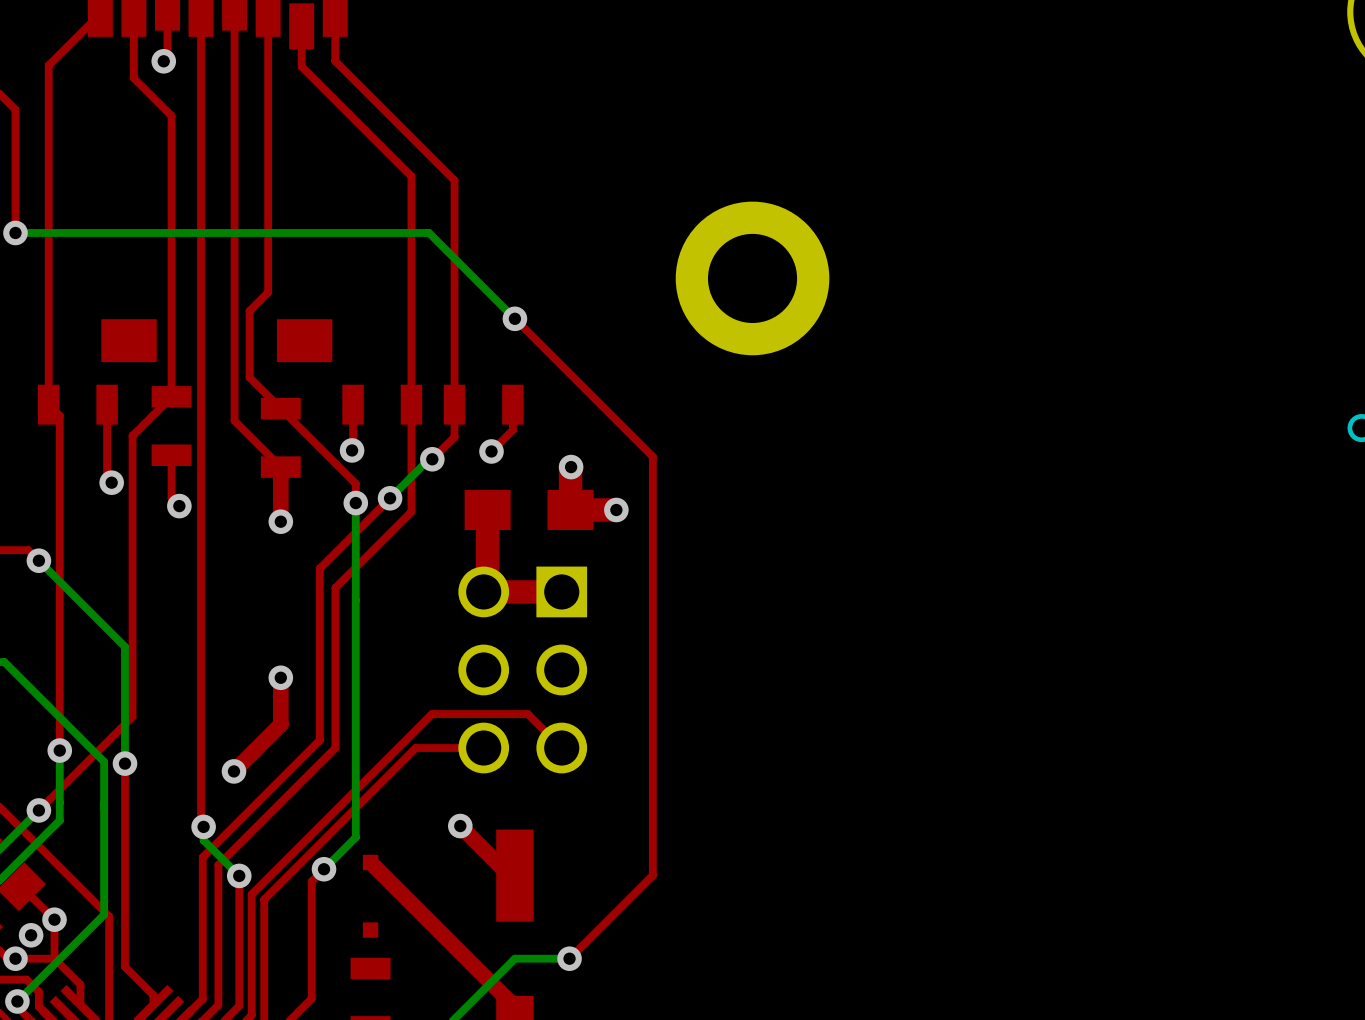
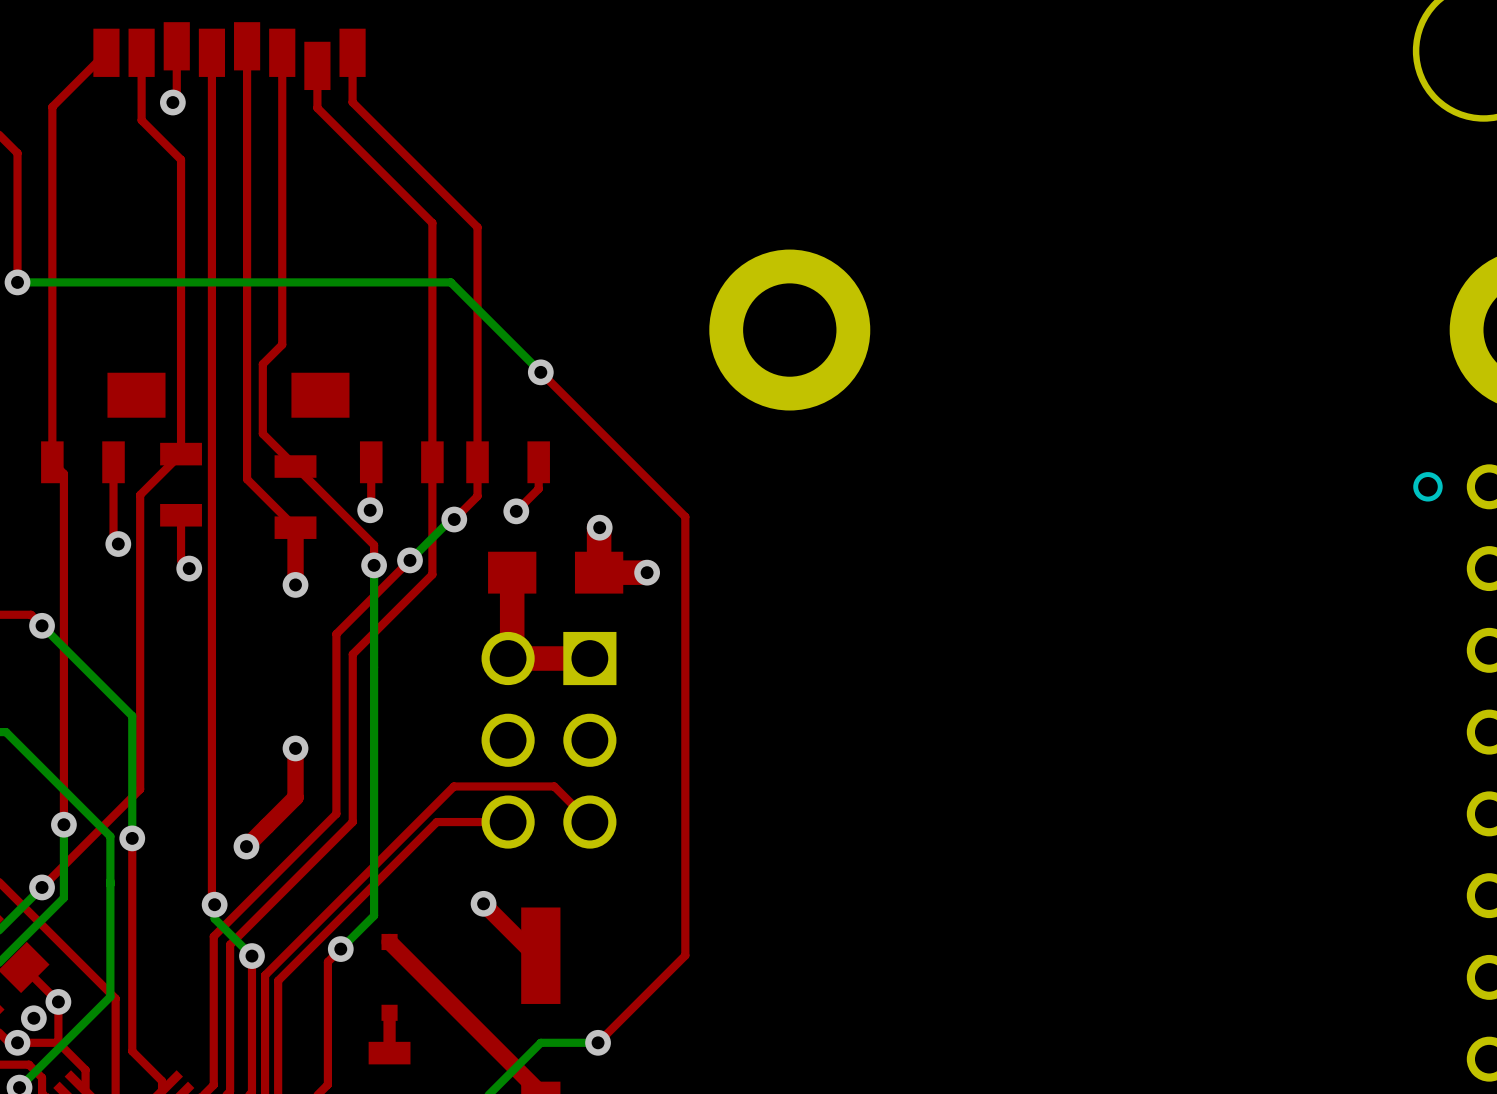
top track: none -> (389, 1012) (389, 1053)

